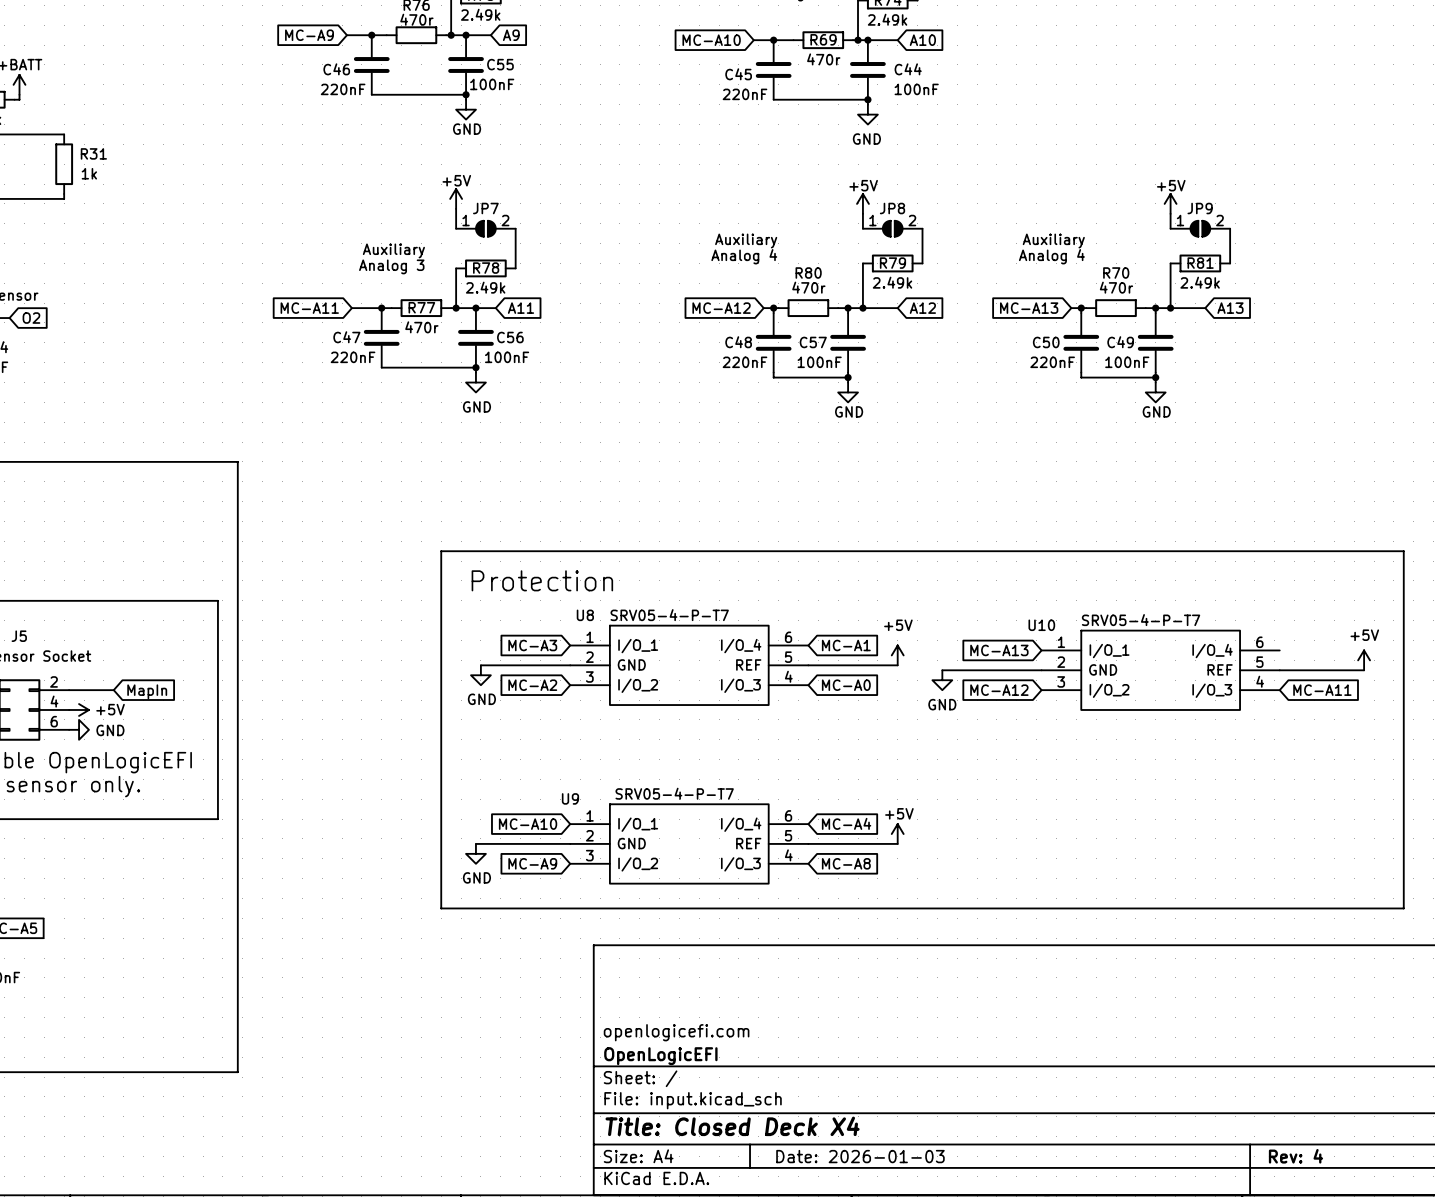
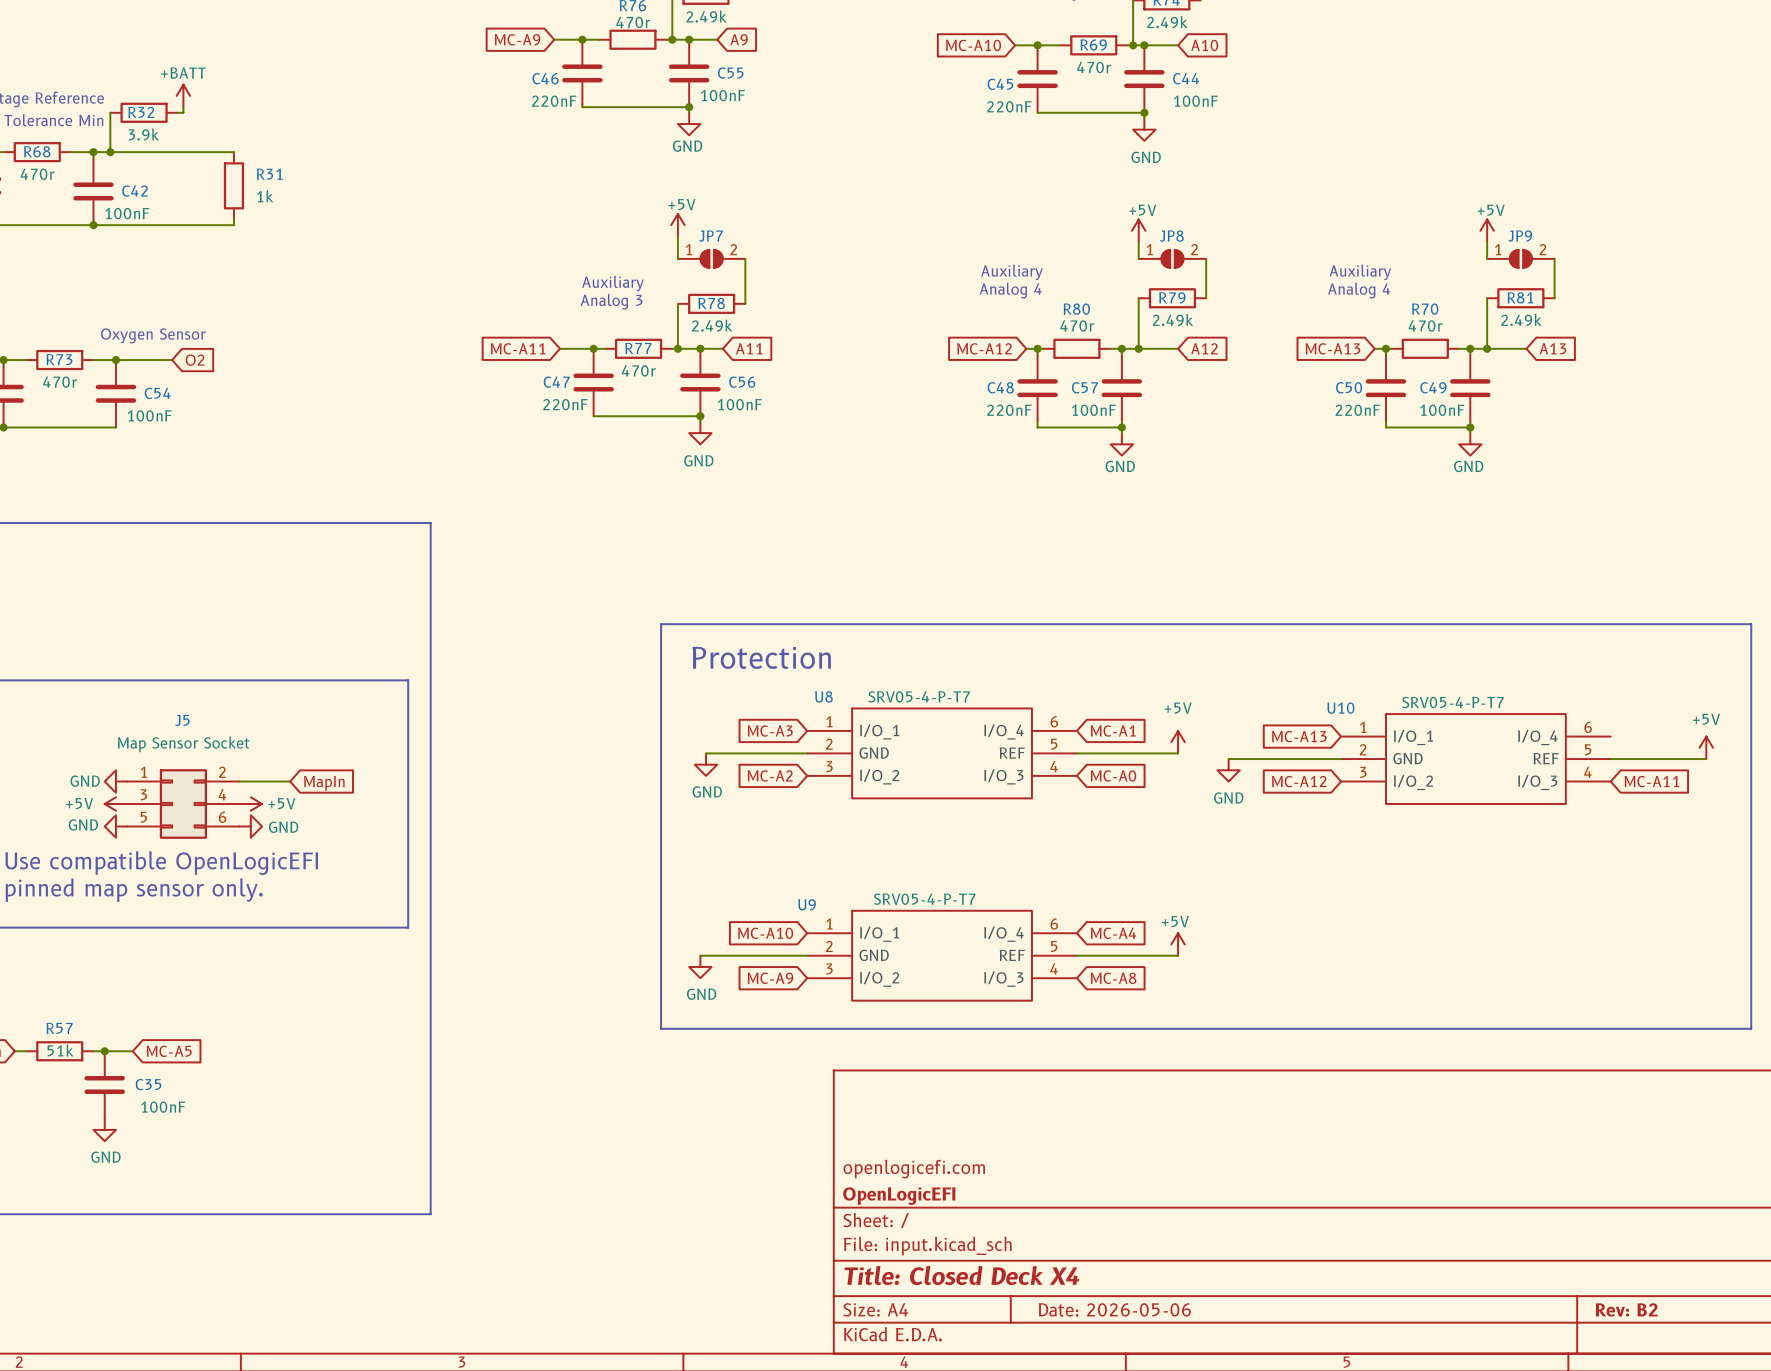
title block: Date: 2026-01-03 (860, 1156) -> Date: 2026-05-06 (1114, 1309)
title block: Rev: 4 (1295, 1156) -> Rev: B2 (1626, 1309)

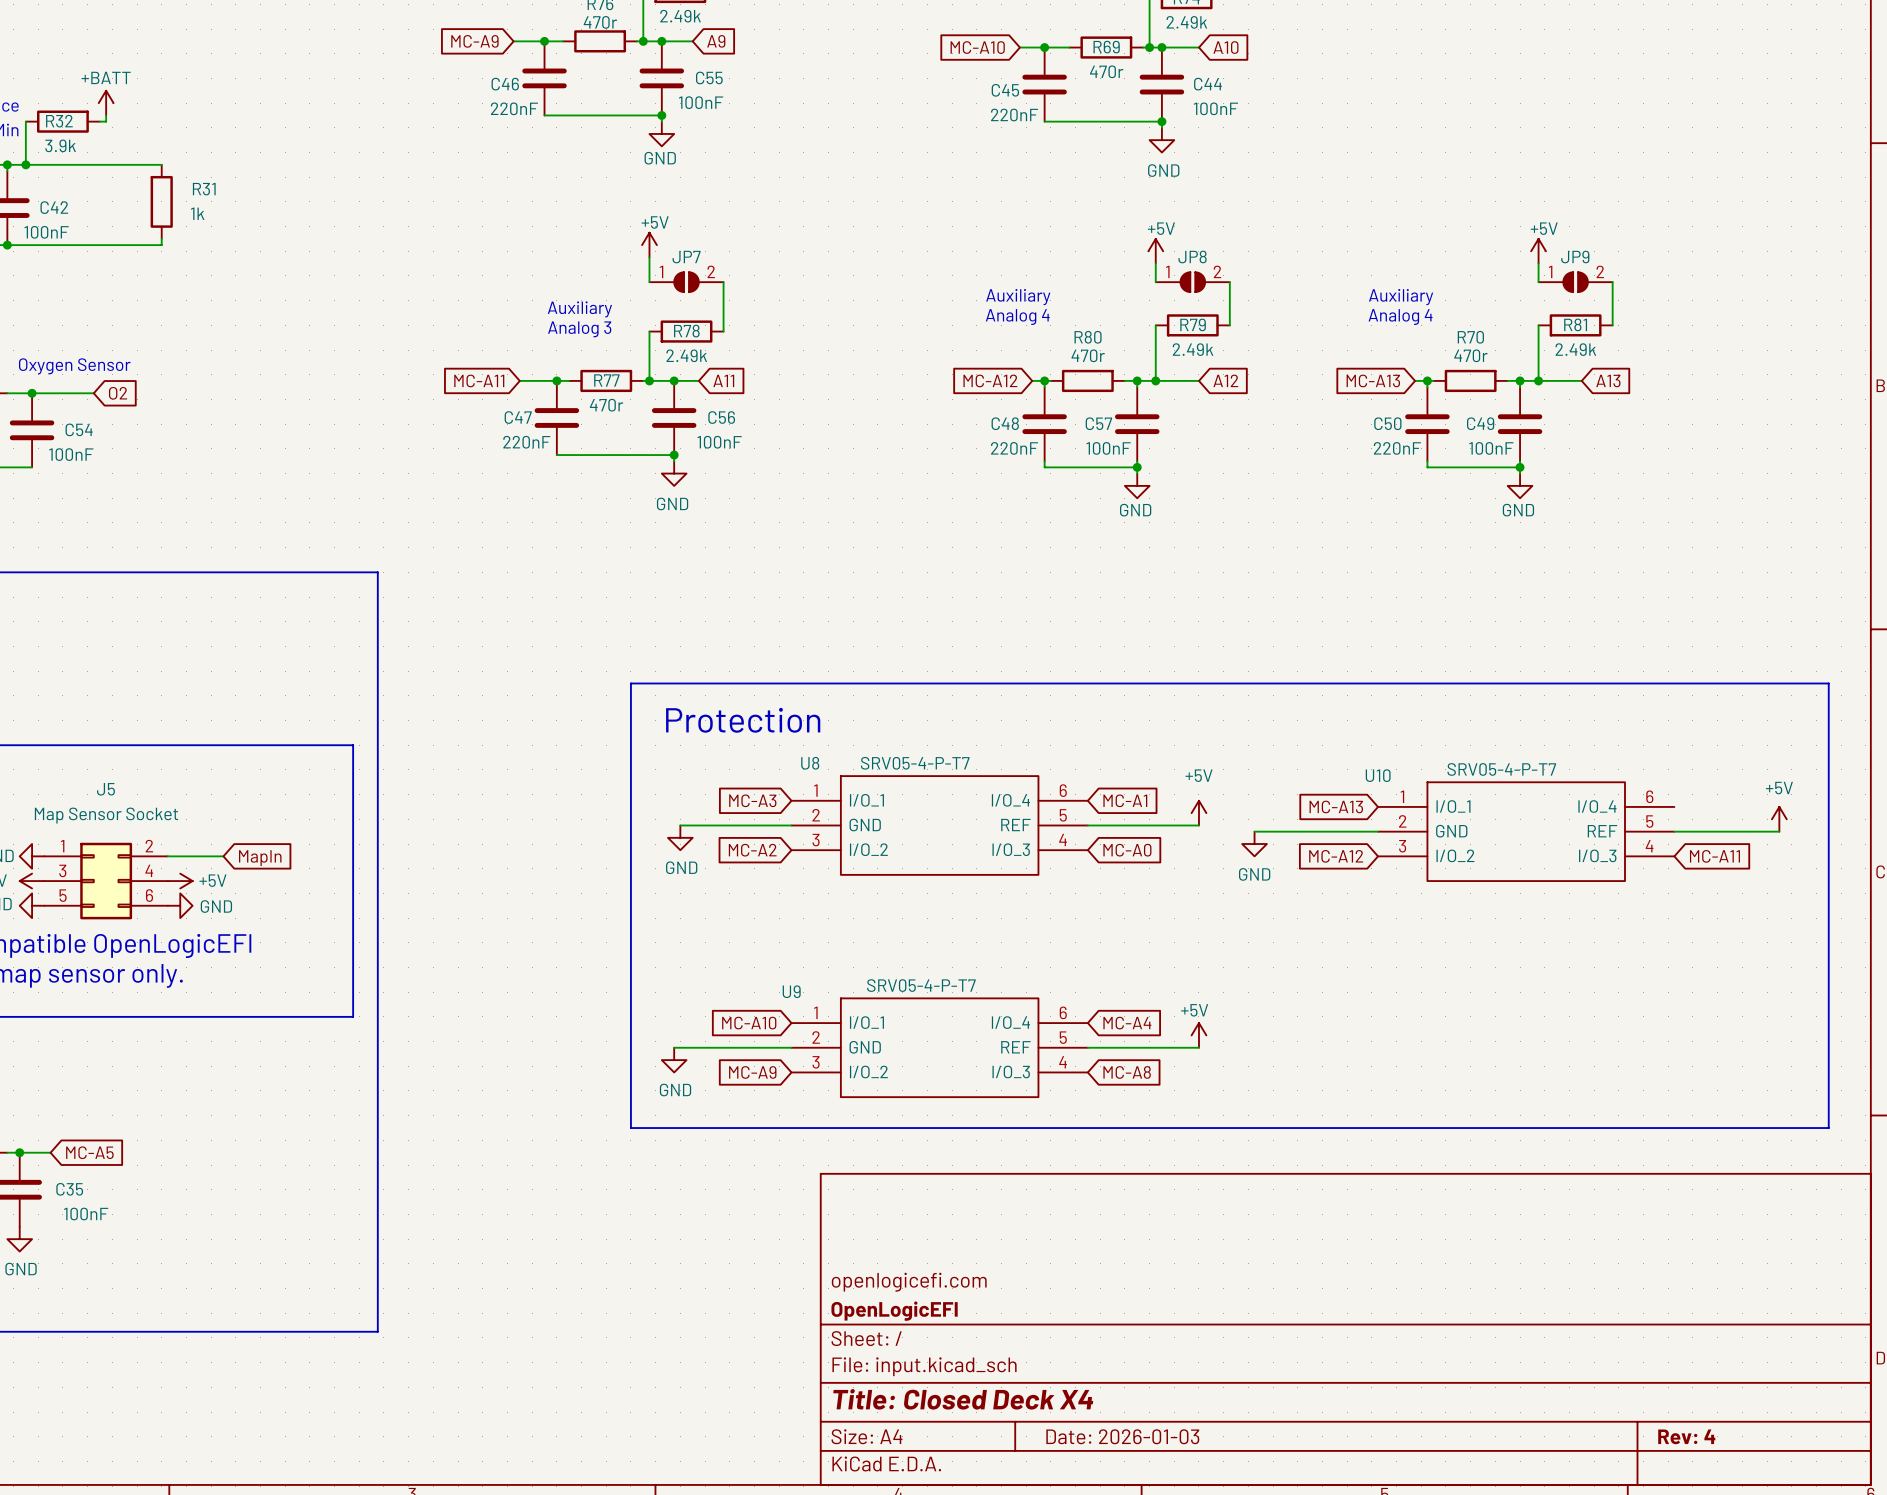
title block: Date: 2026-05-06 (1114, 1309) -> Date: 2026-01-03 (1122, 1436)
title block: Rev: B2 (1626, 1309) -> Rev: 4 (1686, 1436)

